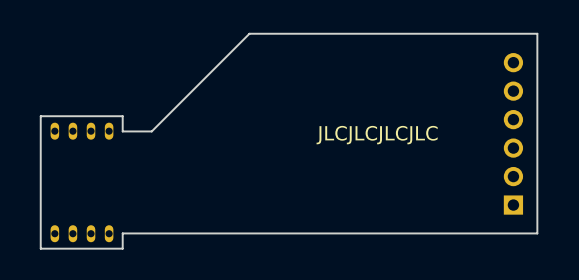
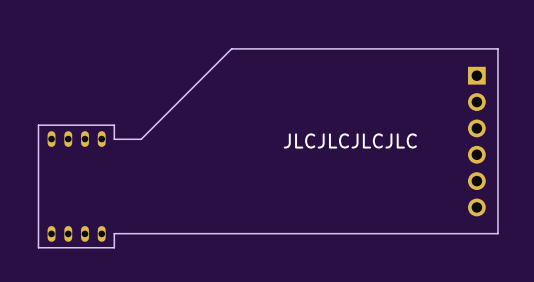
part rotation: 0° (513, 133) -> 180° (476, 141)

